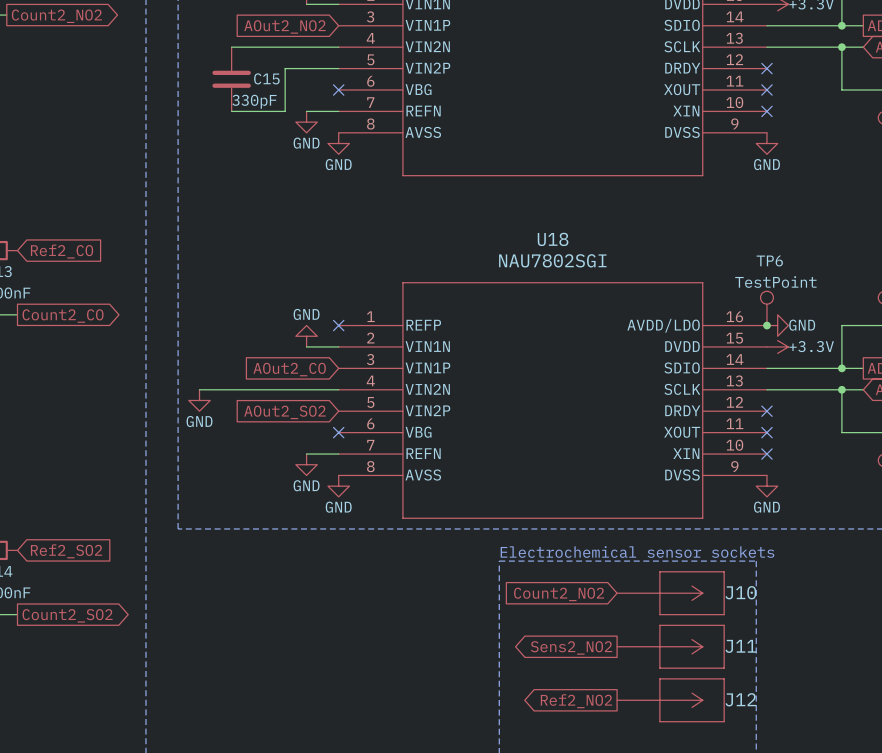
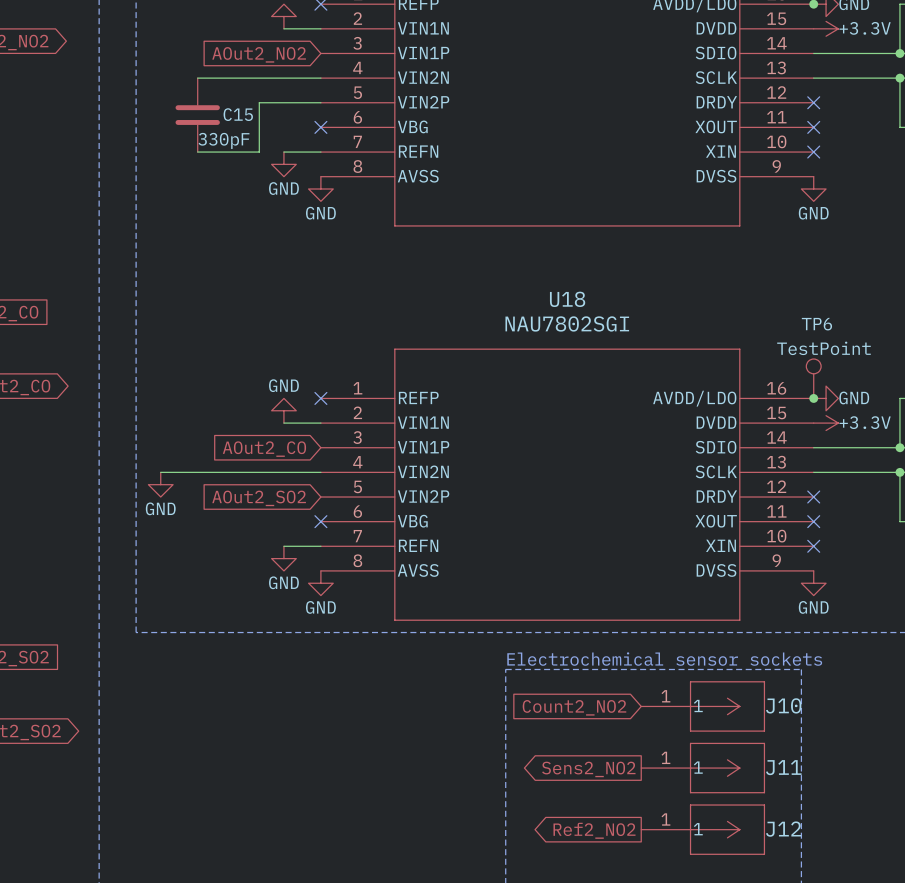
J10 pin number: none -> 1 (665, 696)
J10 pin name: none -> 1 (698, 705)
J11 pin number: none -> 1 (665, 757)
J11 pin name: none -> 1 (698, 767)
J12 pin number: none -> 1 (665, 819)
J12 pin name: none -> 1 (698, 829)

